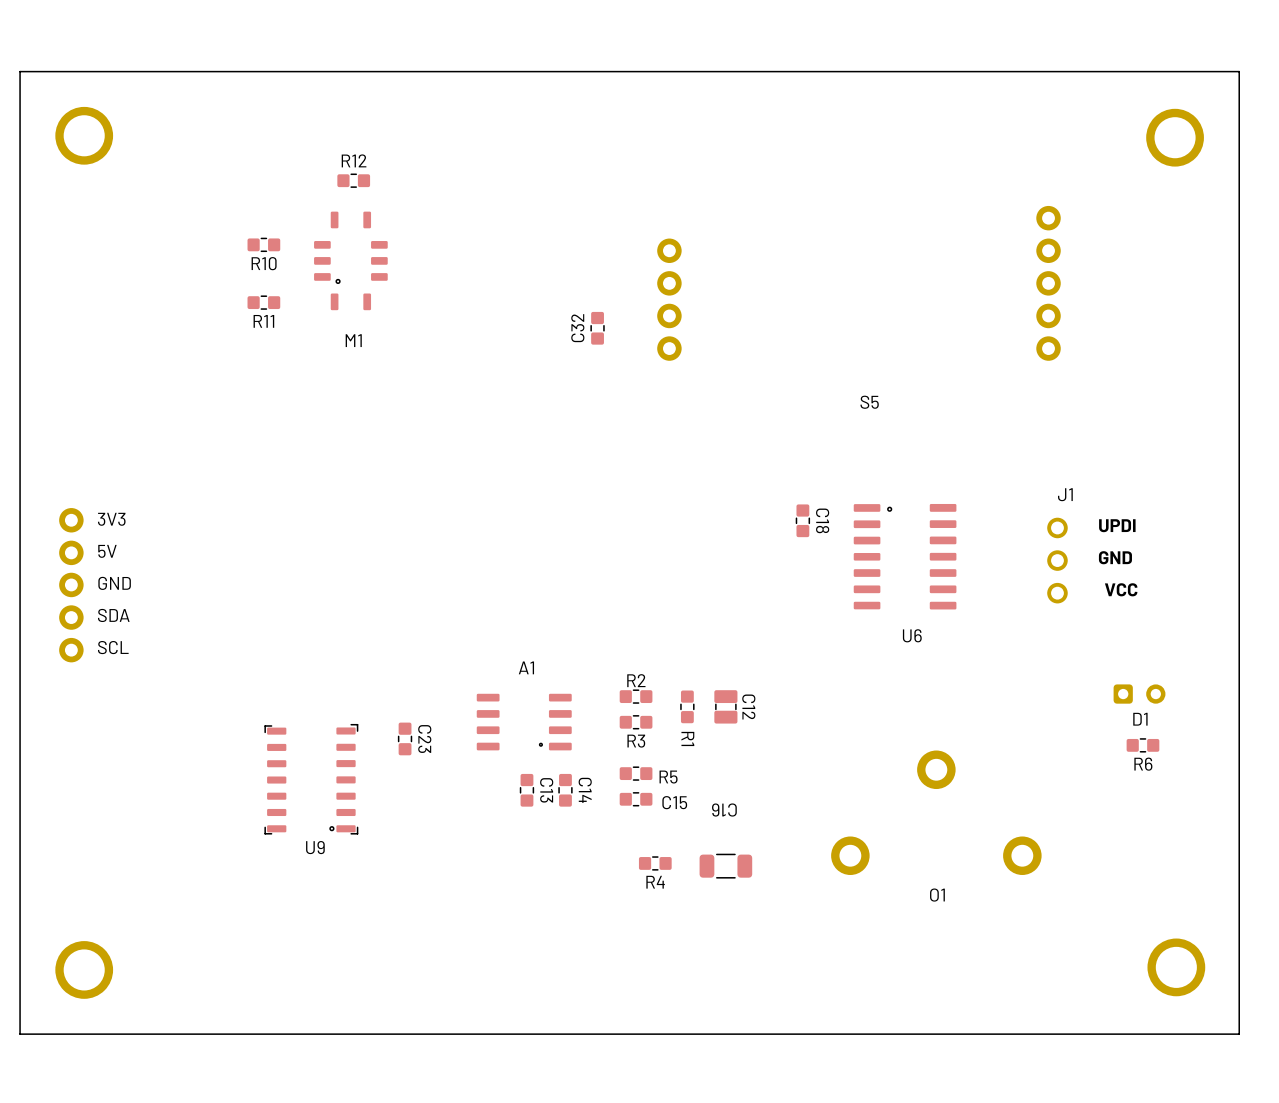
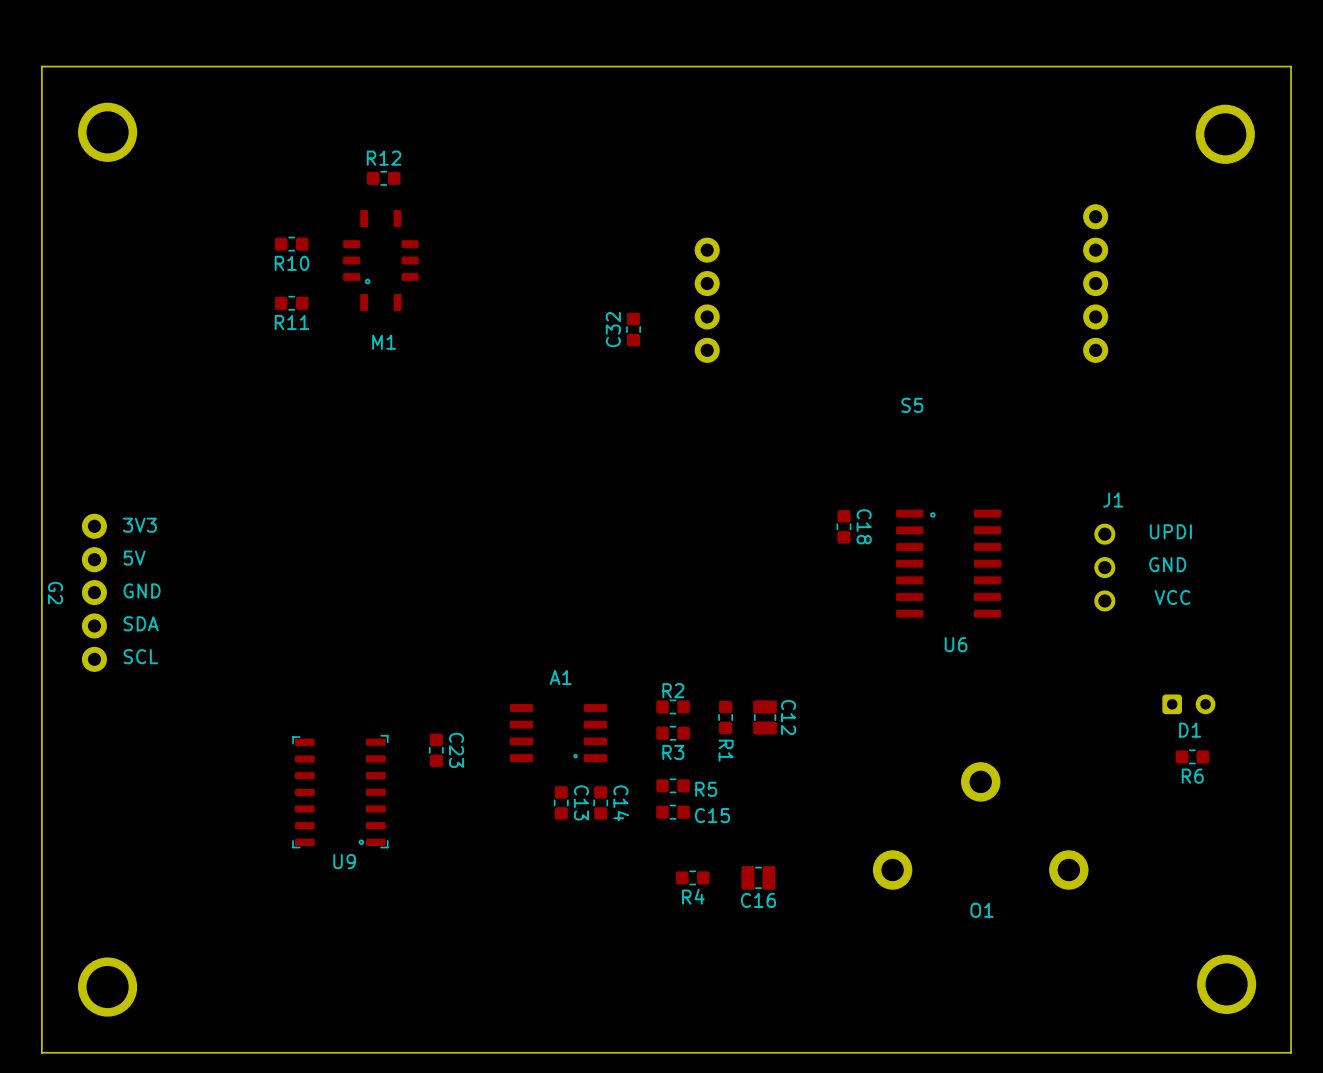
G2 name: none -> G2 (55, 593)
C16 name position: C16 (724, 810) -> C16 (758, 900)
C16 footprint: [699, 853, 753, 879] -> [741, 866, 776, 890]

